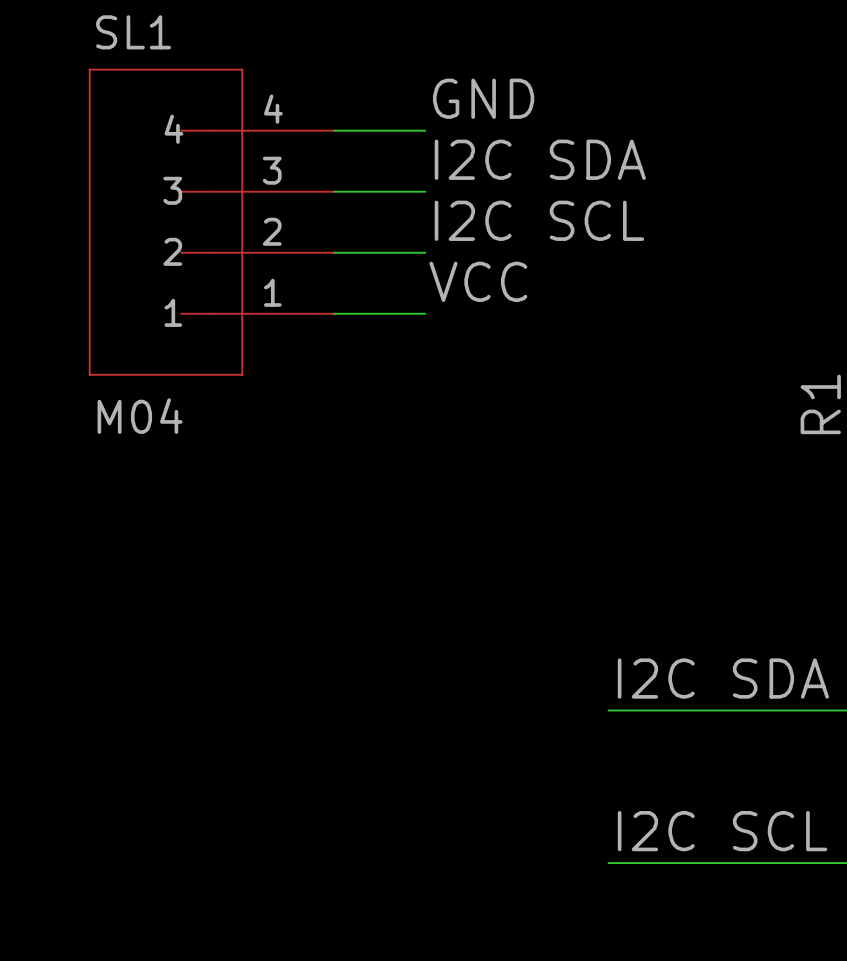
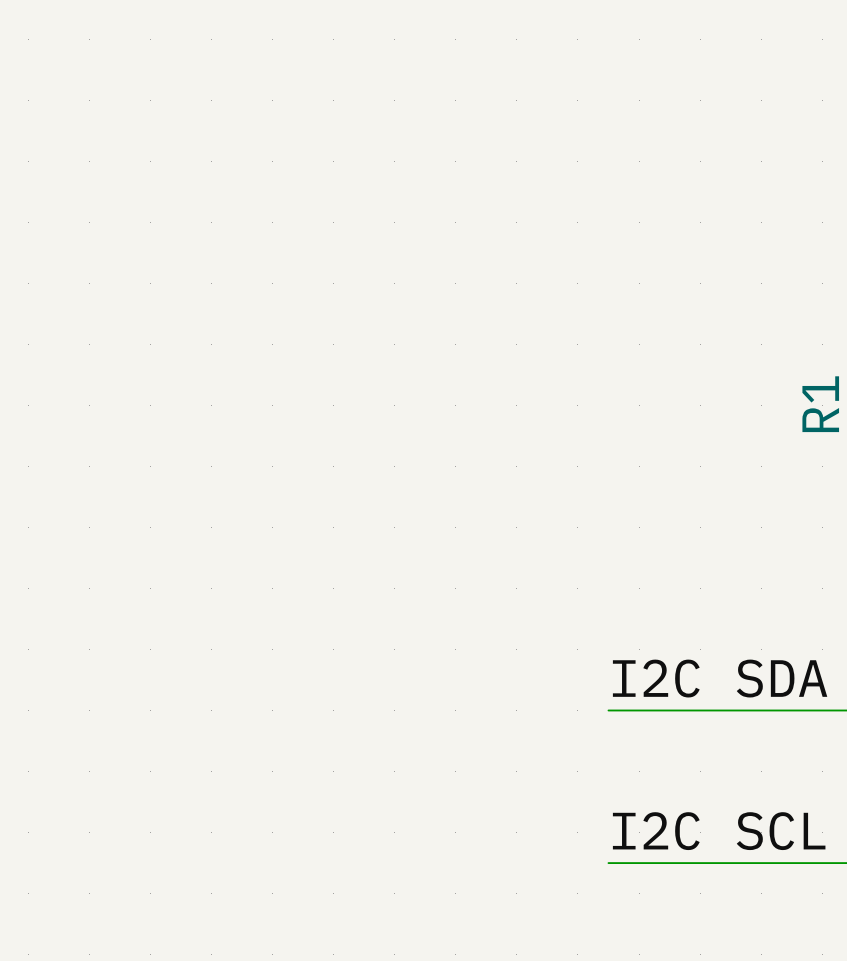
label: GND (483, 98) -> none
wire: (333, 130) (425, 130) -> none
label: I2C SDA (540, 159) -> none
wire: (333, 191) (425, 191) -> none
label: I2C SCL (539, 220) -> none
SL1: M04 (211, 222) -> none
wire: (333, 252) (425, 252) -> none
label: VCC (478, 281) -> none
wire: (333, 313) (425, 313) -> none

